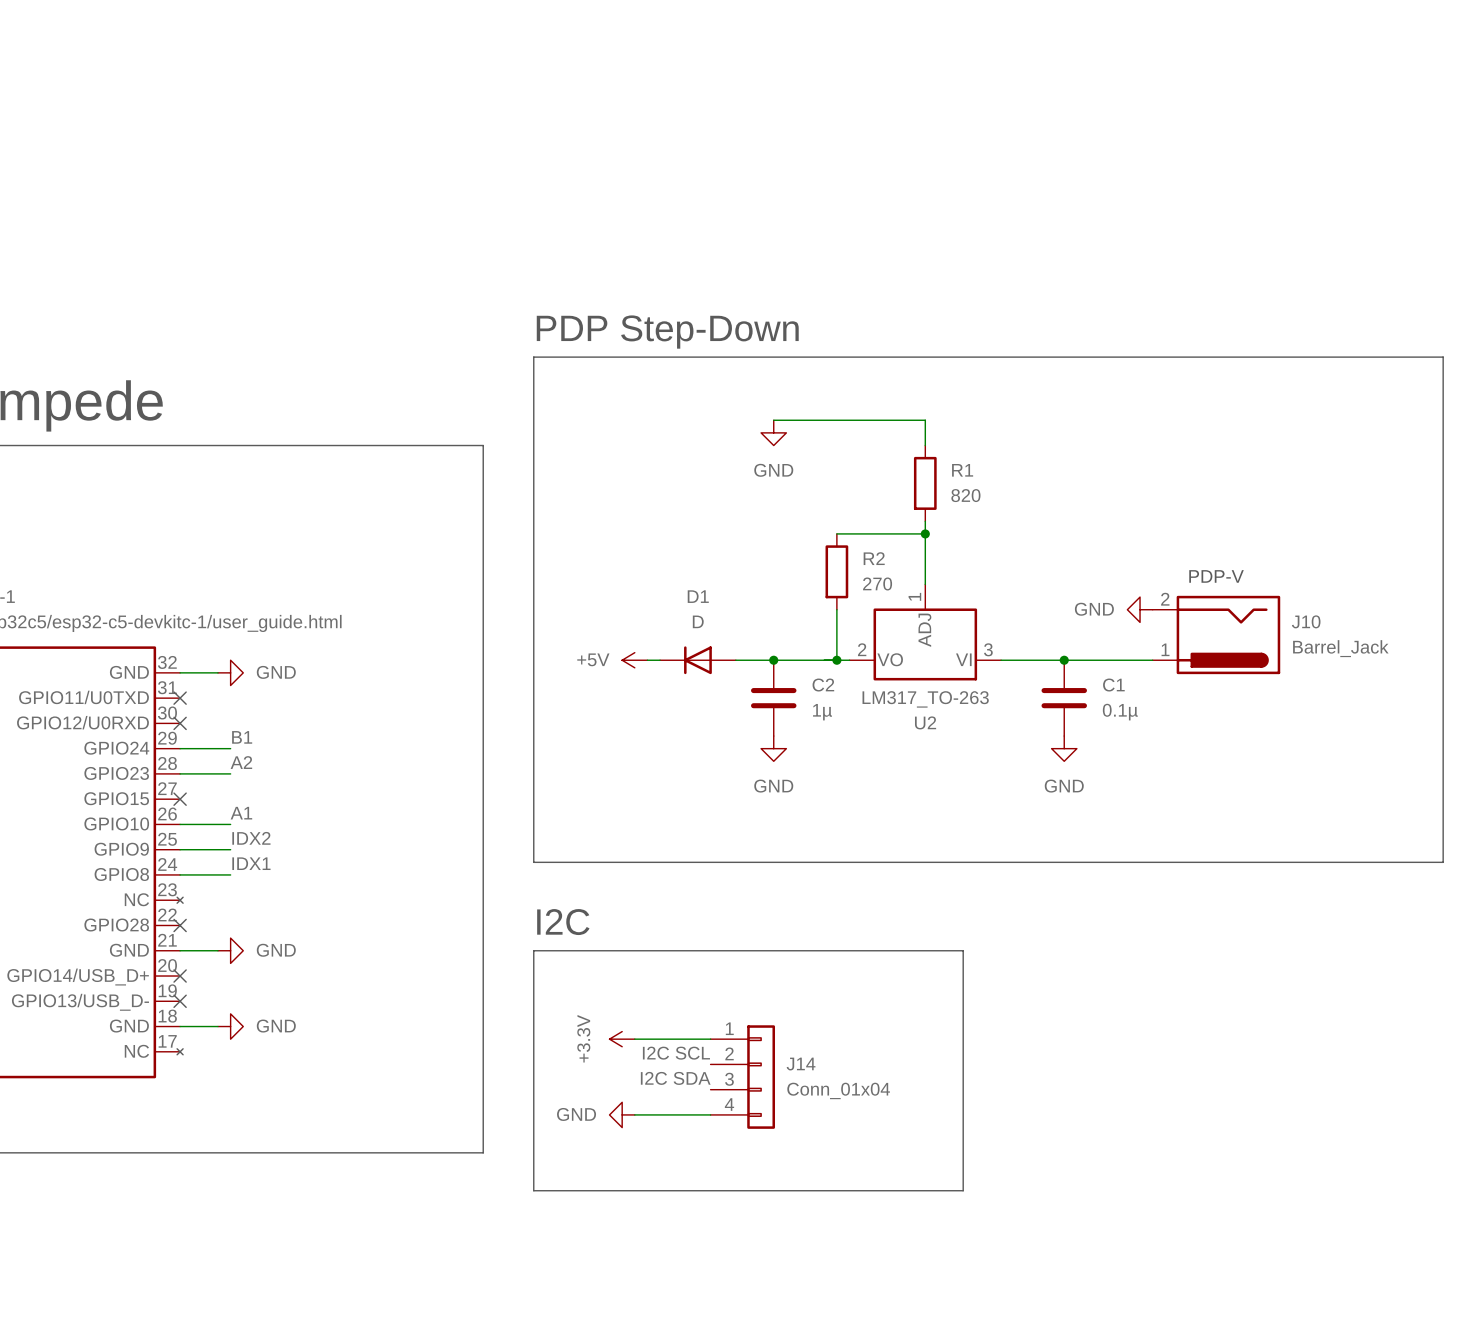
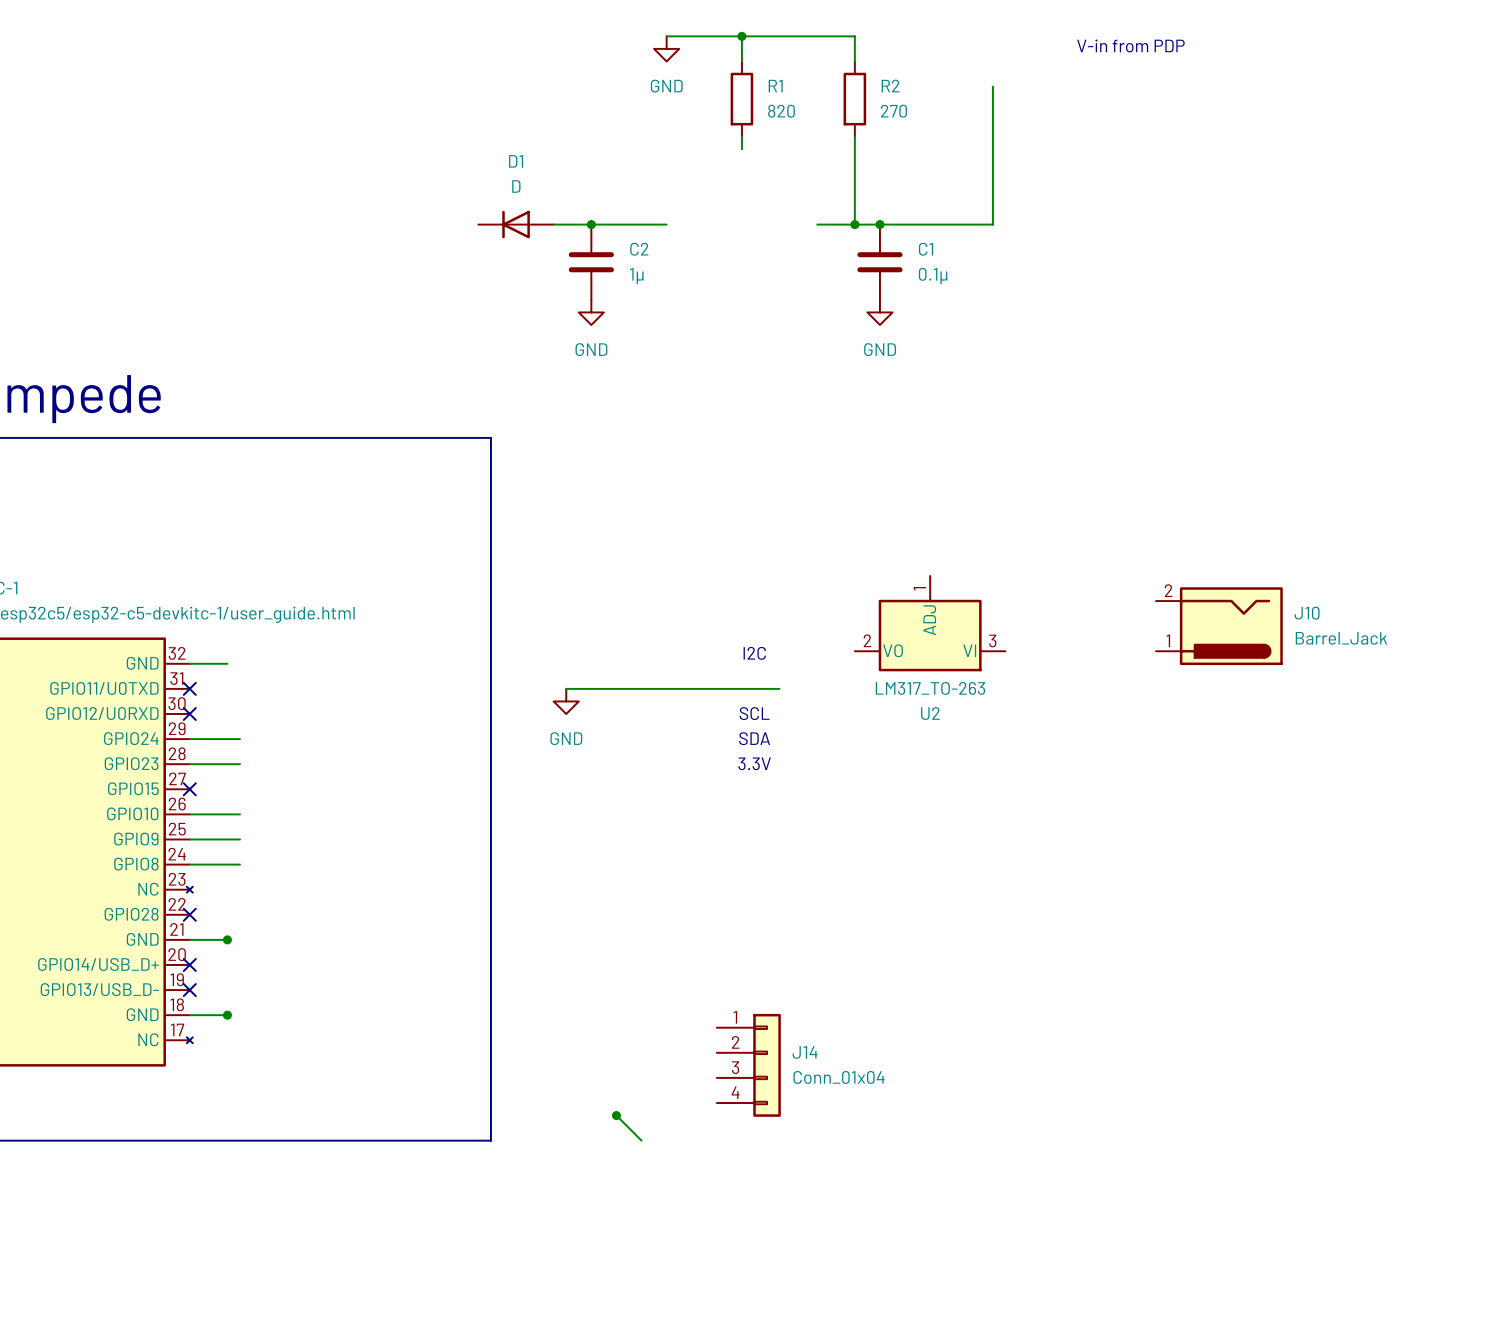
wire: none -> (666, 36) (854, 36) (854, 61)
wire: none -> (741, 36) (741, 61)
junction: none -> (741, 36)
text: none -> V-in from PDP (1130, 45)
power symbol: none -> GND (666, 48)
wire: none -> (992, 86) (992, 224) (817, 224)
wire: none -> (741, 136) (741, 149)
wire: none -> (854, 136) (854, 224)
wire: none -> (553, 224) (666, 224)
junction: none -> (591, 224)
junction: none -> (854, 224)
junction: none -> (879, 224)
power symbol: none -> GND (591, 312)
power symbol: none -> GND (879, 312)
text: PDP Step-Down (667, 332) -> none
line: (533, 357) (1443, 357) (1443, 862) (533, 862) (533, 357) -> none
wire: (773, 420) (925, 420) (925, 445) -> none
power symbol: GND (773, 432) -> none
R1 position: (925, 483) -> (741, 99)
wire: (925, 521) (925, 584) -> none
wire: (836, 533) (925, 533) -> none
junction: (925, 533) -> none
R2 position: (836, 571) -> (854, 99)
text: PDP-V (1216, 576) -> none
wire: (836, 609) (836, 660) -> none
power symbol: GND (1140, 609) -> none
power symbol: +5V (634, 660) -> none
wire: (647, 660) (660, 660) -> none
D1 position: (697, 660) -> (516, 224)
wire: (735, 660) (849, 660) -> none
junction: (773, 660) -> none
junction: (836, 660) -> none
wire: (1001, 660) (1152, 660) -> none
junction: (1064, 660) -> none
text: none -> I2C (754, 653)
power symbol: GND (230, 672) -> none
wire: none -> (566, 688) (779, 688)
C2 position: (773, 698) -> (591, 262)
C1 position: (1064, 698) -> (879, 262)
power symbol: none -> GND (566, 701)
text: none -> SCL (754, 713)
label: B1 (242, 737) -> none
text: none -> SDA (754, 738)
power symbol: GND (773, 748) -> none
power symbol: GND (1064, 748) -> none
label: A2 (241, 762) -> none
text: none -> 3.3V (754, 763)
label: A1 (241, 813) -> none
label: IDX2 (251, 838) -> none
label: IDX1 (251, 863) -> none
text: I2C (563, 922) -> none
junction: none -> (227, 939)
power symbol: GND (230, 950) -> none
line: (533, 950) (533, 1190) (963, 1190) (963, 950) (533, 950) -> none
junction: none -> (227, 1015)
power symbol: GND (230, 1026) -> none
power symbol: +3.3V (622, 1039) -> none
wire: (634, 1039) (710, 1039) -> none
label: I2C SCL (676, 1053) -> none
label: I2C SDA (675, 1078) -> none
power symbol: GND (622, 1114) -> none
wire: (634, 1114) (710, 1114) -> none
wire: none -> (616, 1115) (641, 1140)
junction: none -> (616, 1115)

